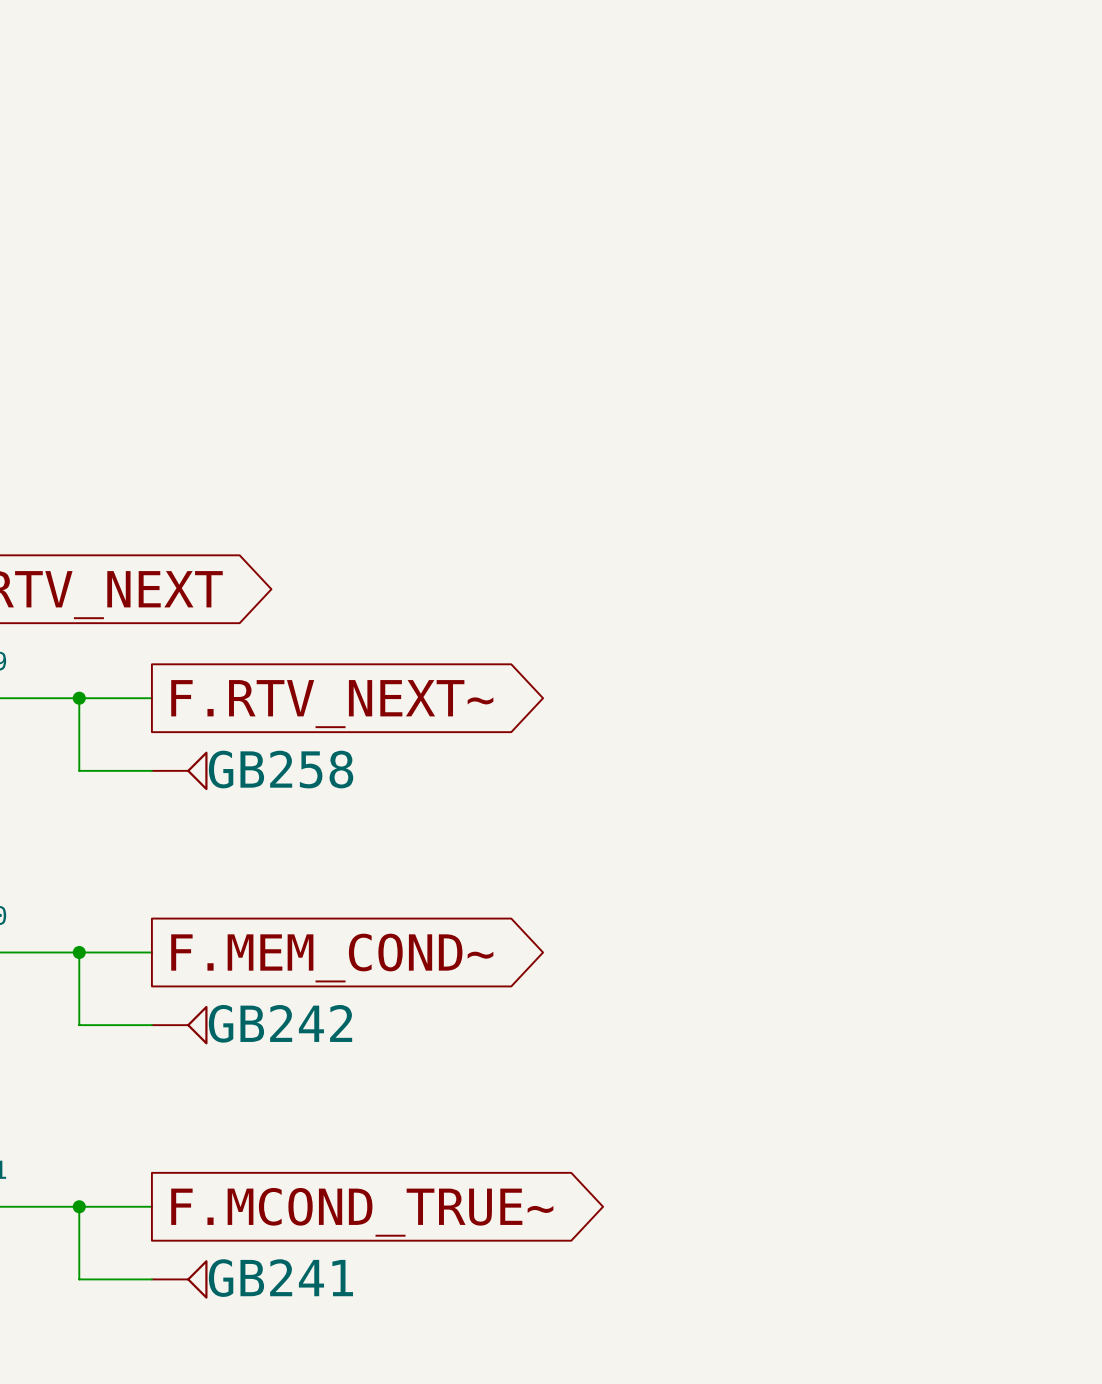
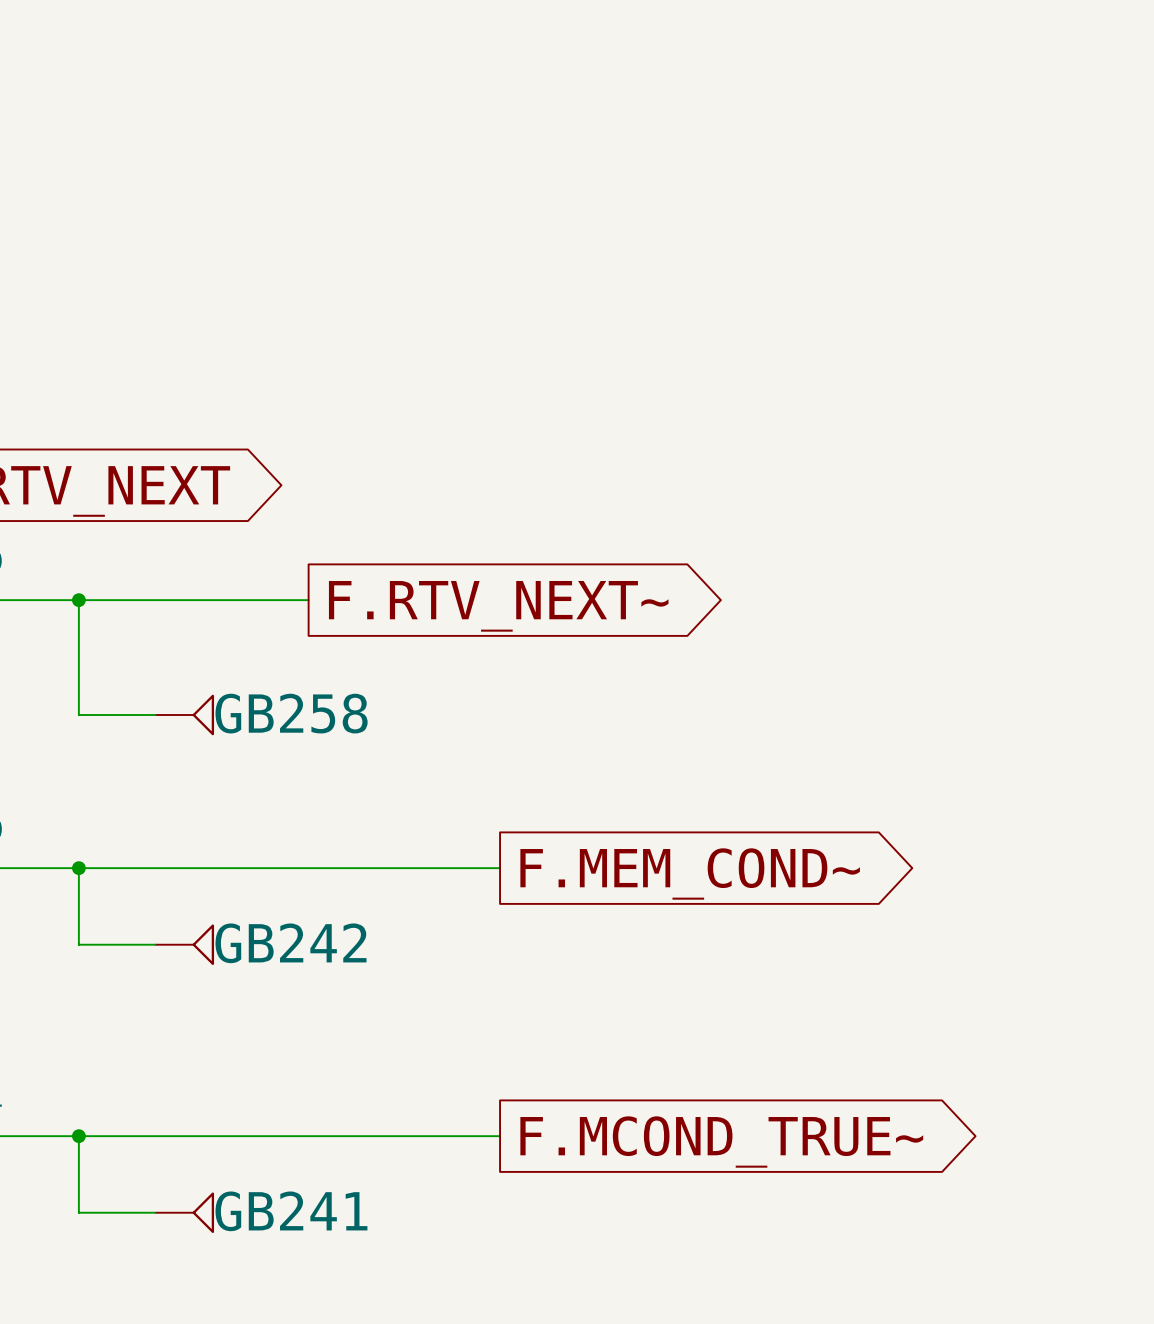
wire: none -> (155, 600) (308, 600)
global label position: F.RTV_NEXT~ (332, 704) -> F.RTV_NEXT~ (498, 606)
wire: (79, 770) (151, 770) -> (78, 676) (78, 714) (155, 714)
GB258 position: (179, 770) -> (184, 714)
wire: none -> (155, 868) (500, 868)
global label position: F.MEM_COND~ (332, 958) -> F.MEM_COND~ (690, 873)
wire: none -> (155, 1136) (500, 1136)
global label position: F.MCOND_TRUE~ (362, 1212) -> F.MCOND_TRUE~ (721, 1142)

